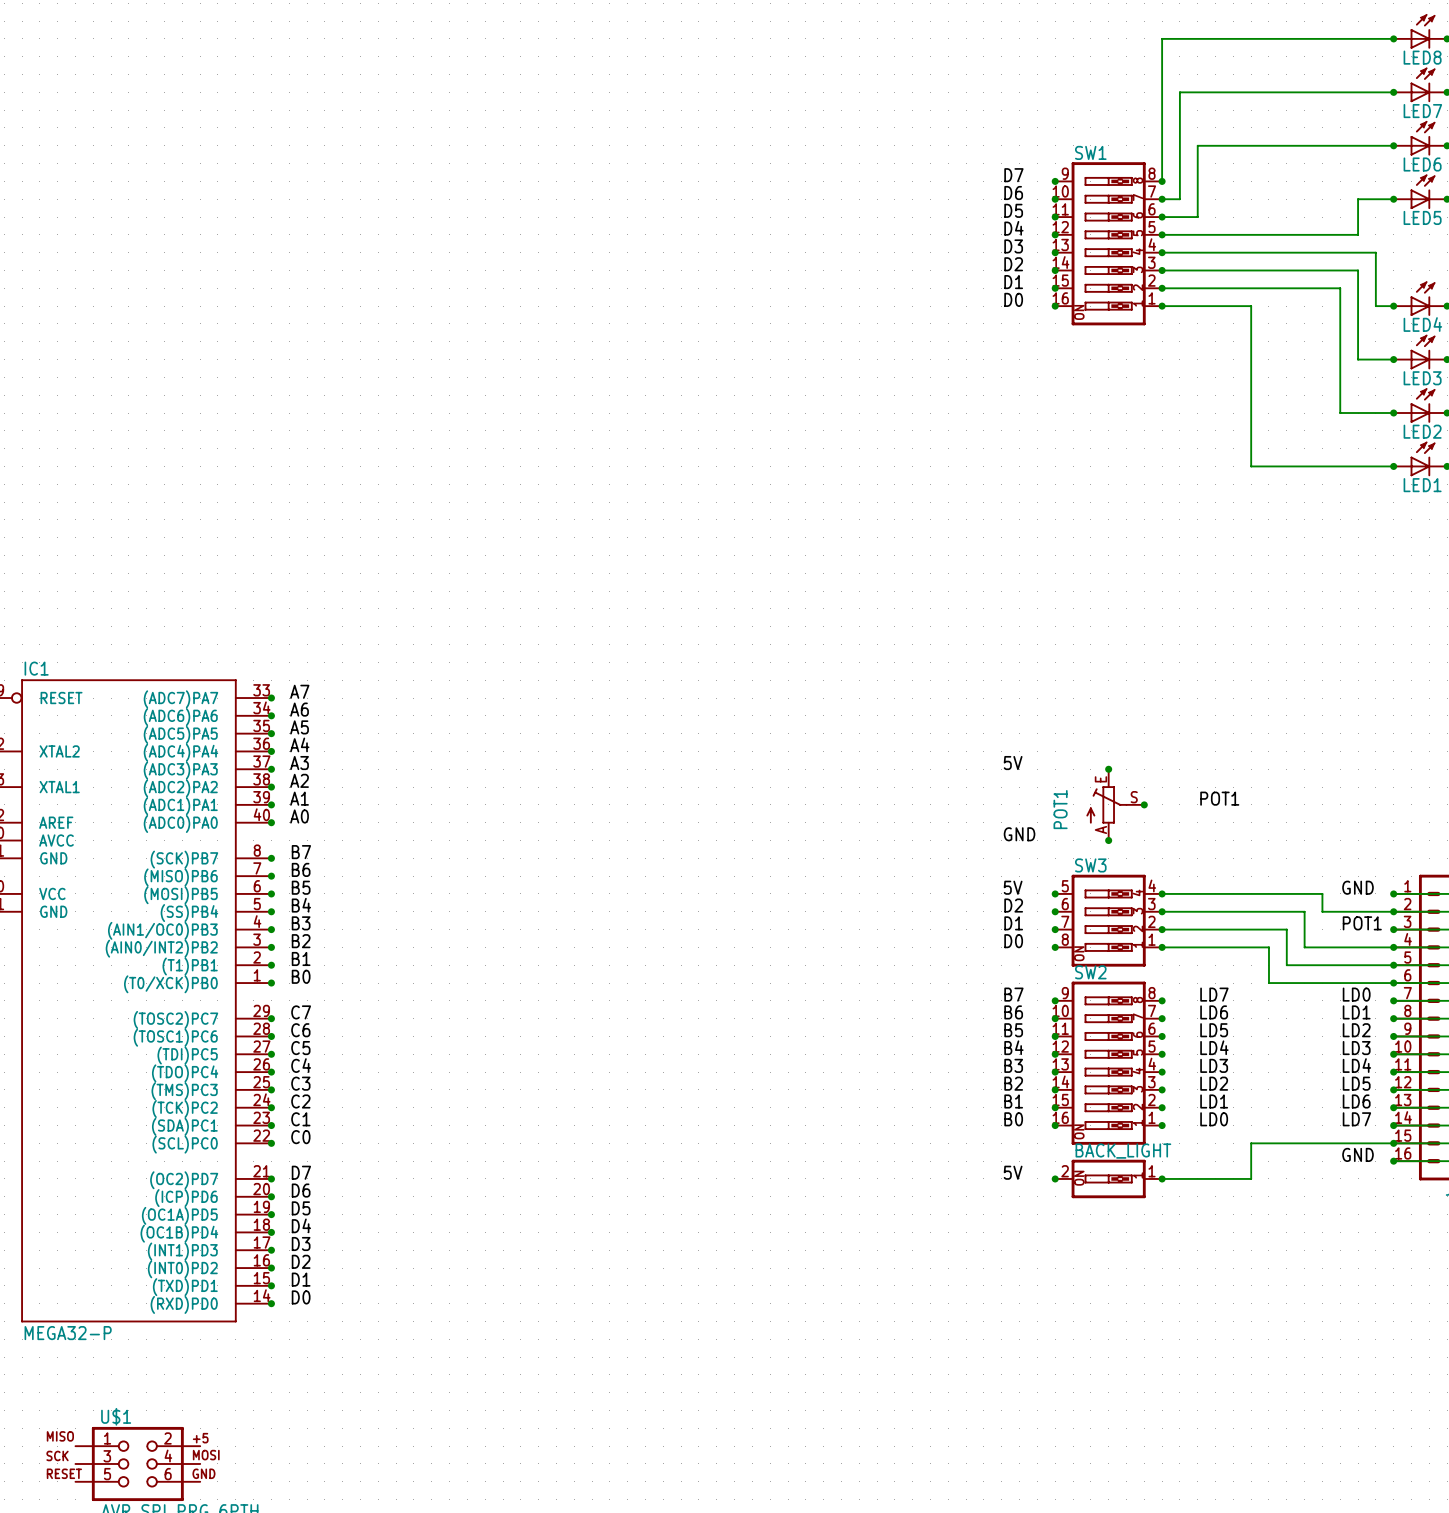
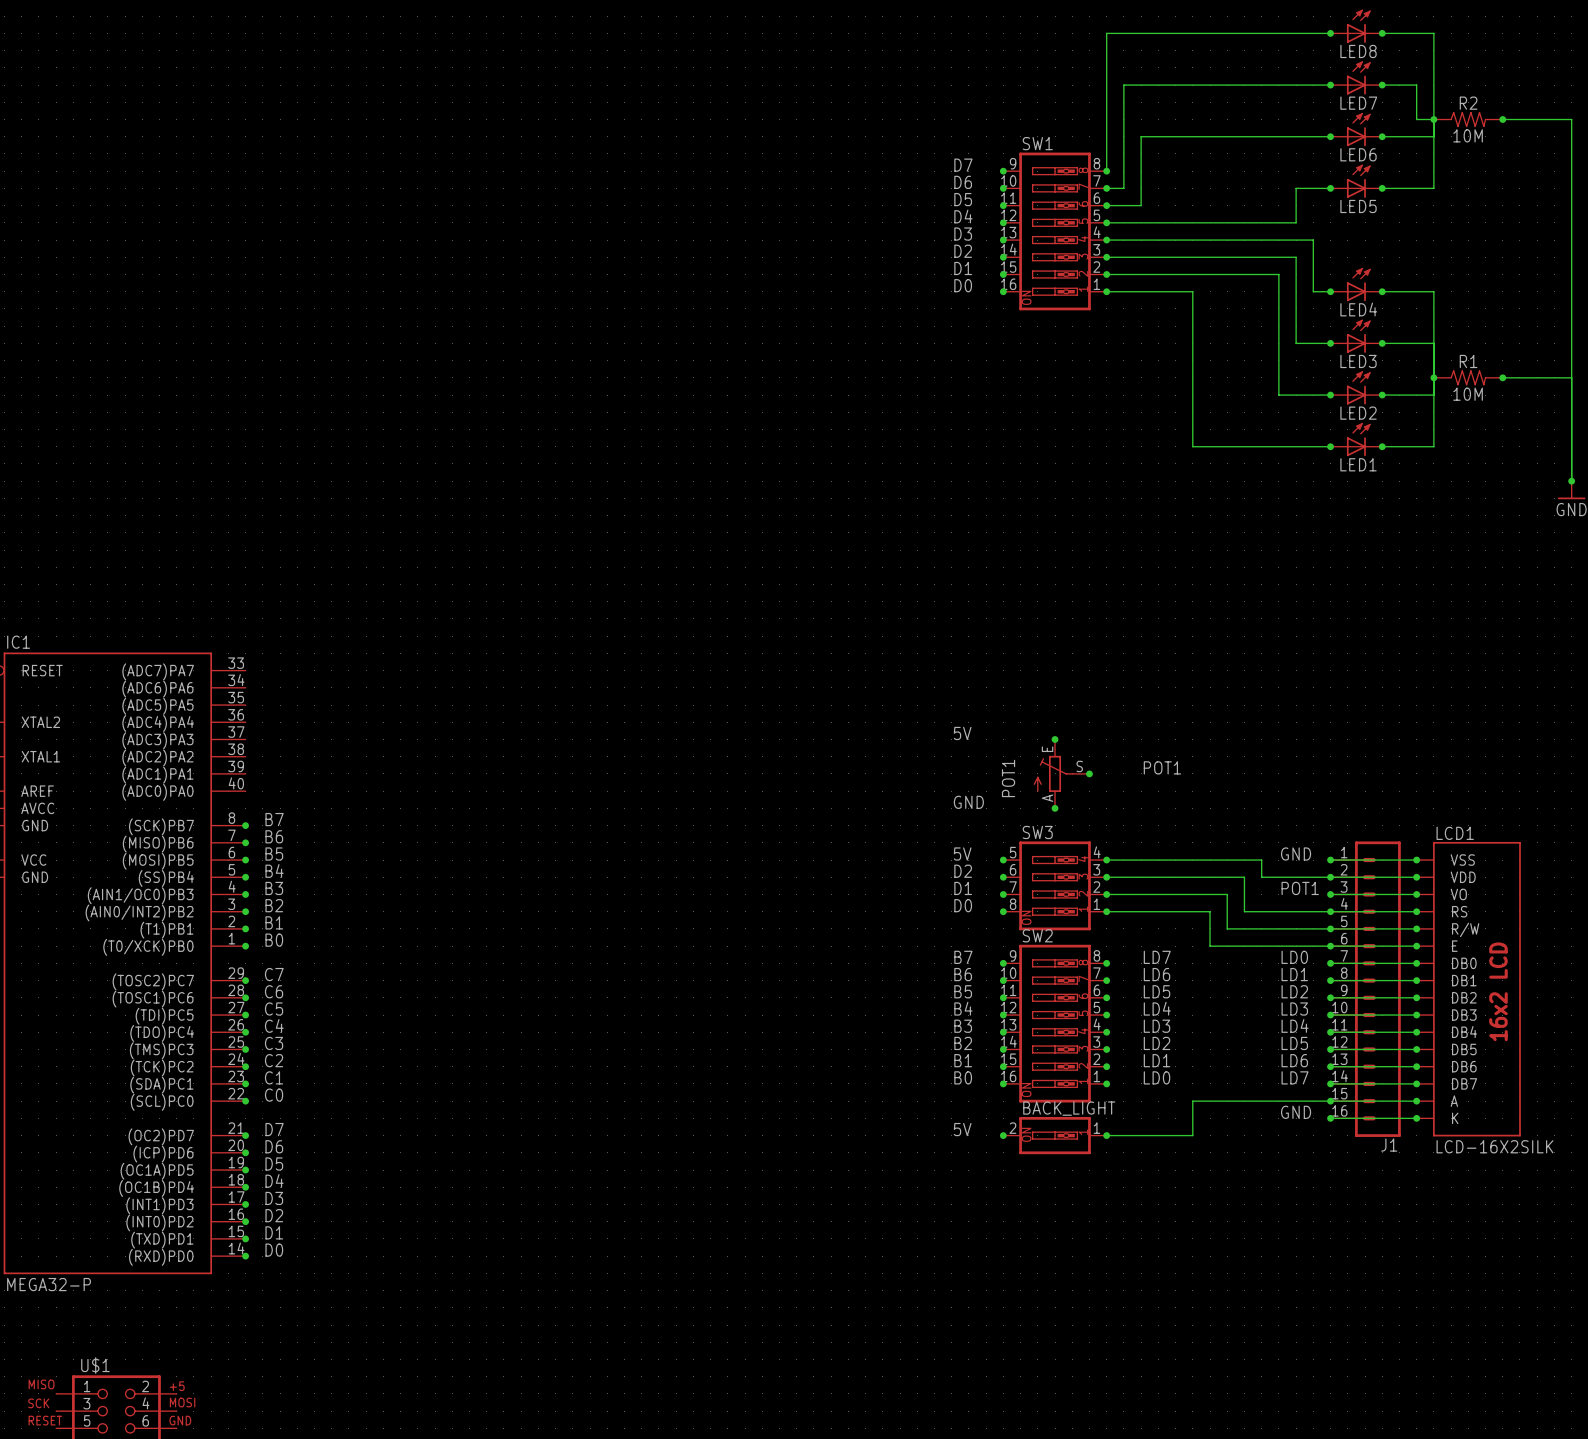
label: A7 (299, 691) -> none
junction: (271, 698) -> none
label: A6 (299, 709) -> none
junction: (271, 715) -> none
label: A5 (299, 727) -> none
junction: (271, 733) -> none
label: A4 (299, 744) -> none
junction: (271, 751) -> none
label: A3 (299, 763) -> none
junction: (271, 769) -> none
label: A2 (299, 780) -> none
junction: (271, 787) -> none
label: A1 (299, 798) -> none
junction: (271, 804) -> none
label: A0 (299, 816) -> none
junction: (271, 822) -> none

